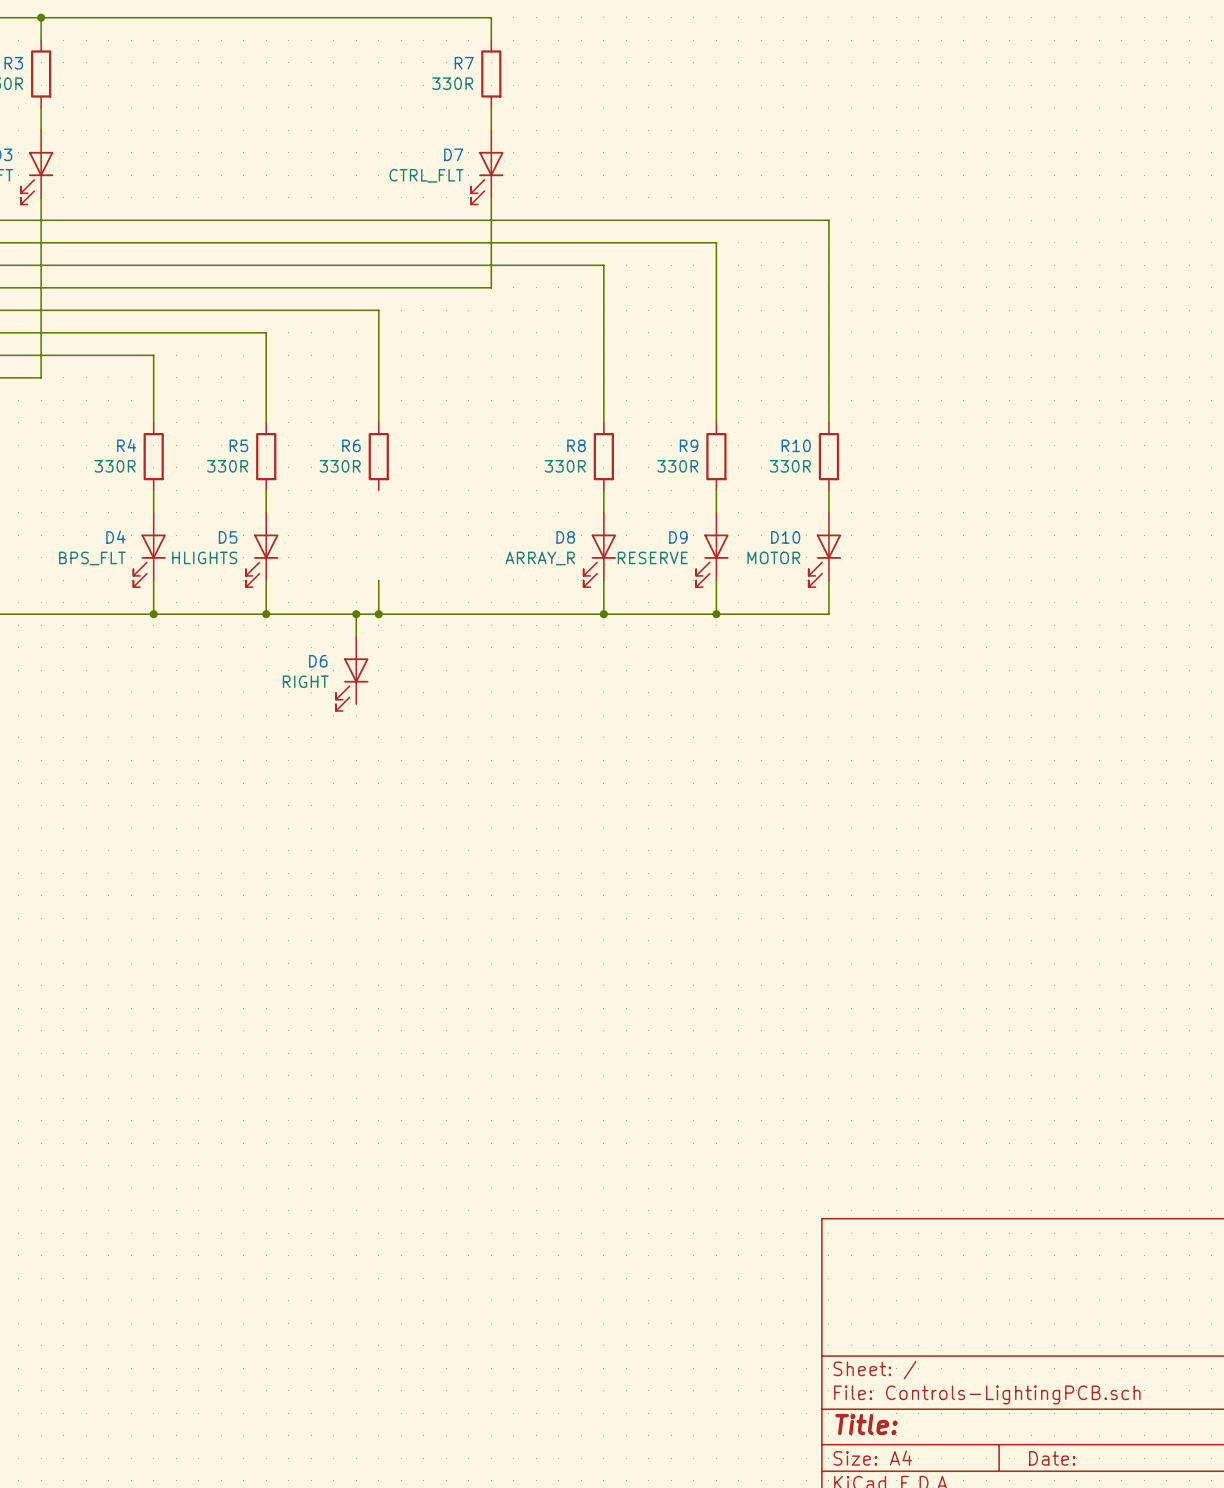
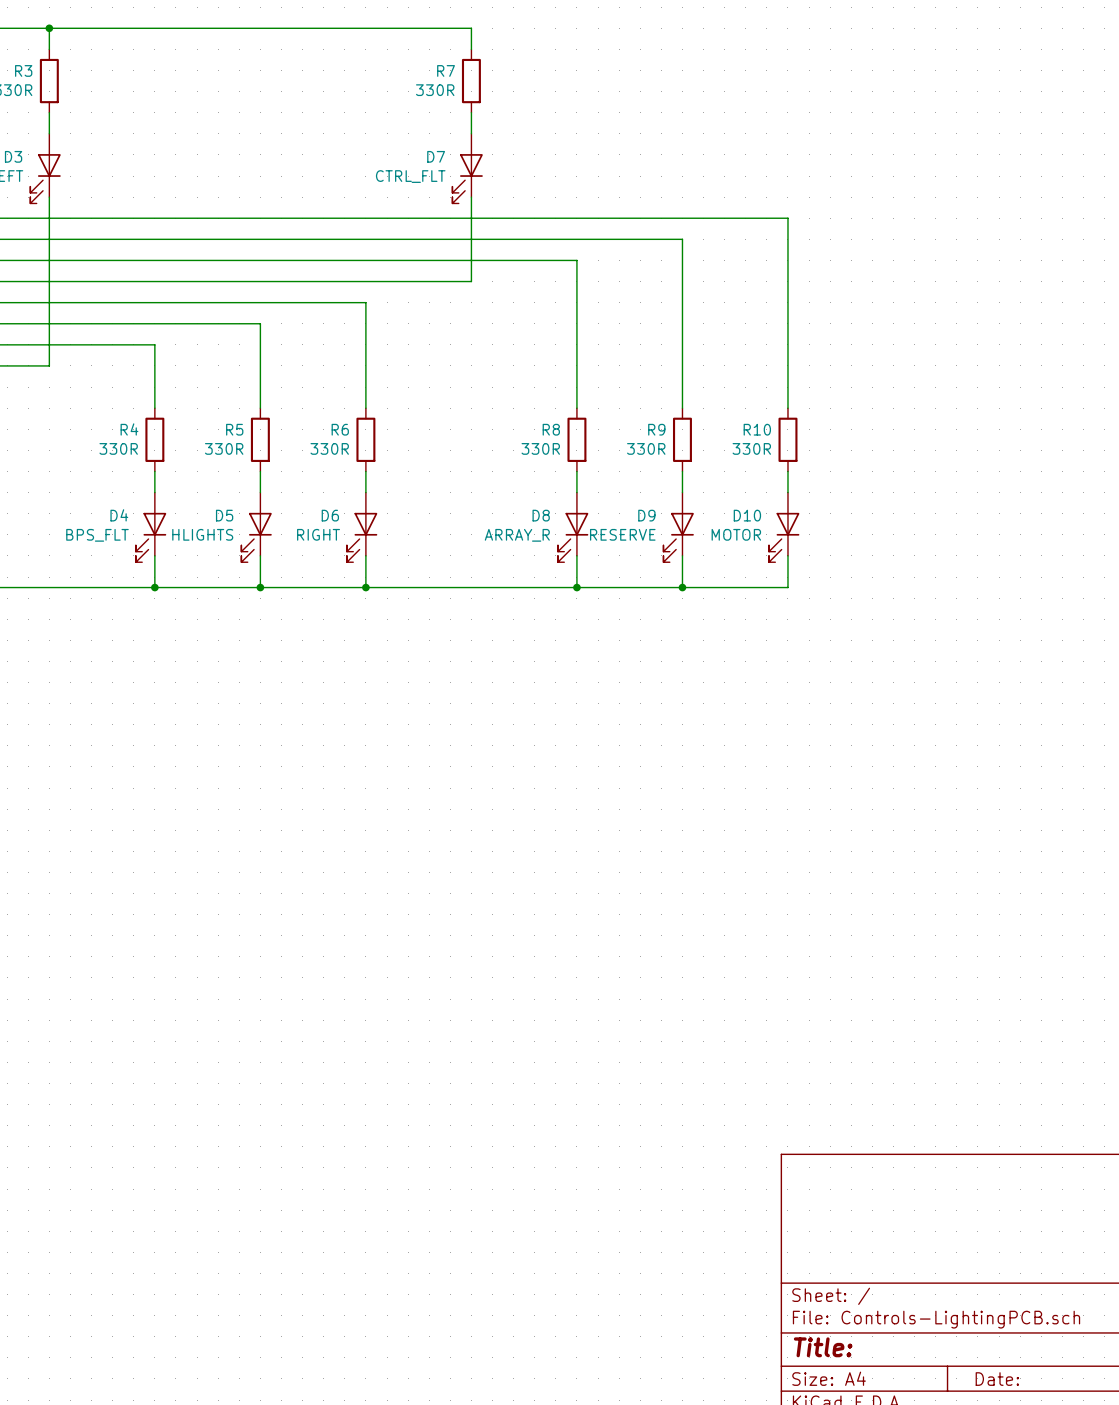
wire: (356, 614) (356, 636) -> (365, 471) (365, 492)
junction: (356, 614) -> none
D6 position: (352, 673) -> (362, 527)

